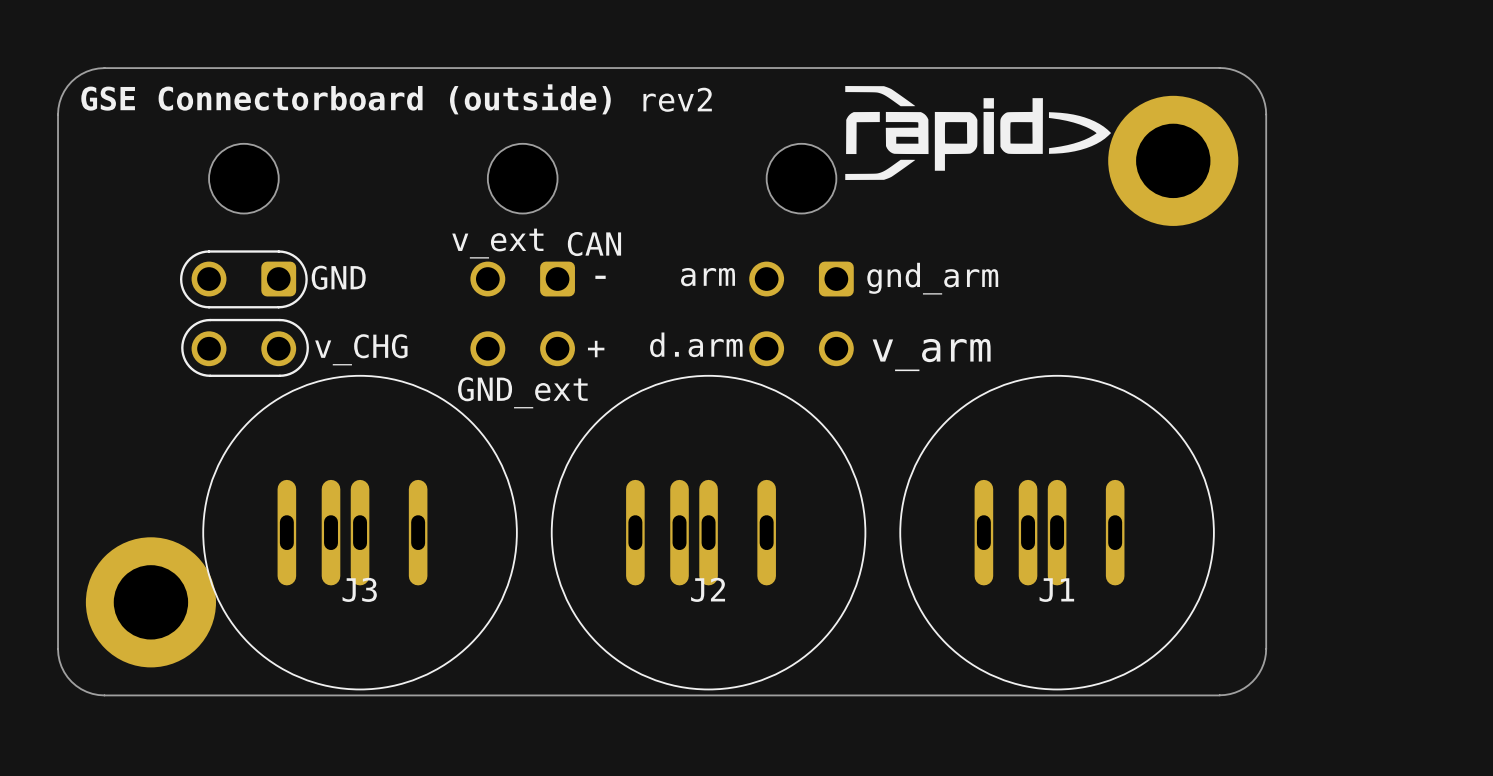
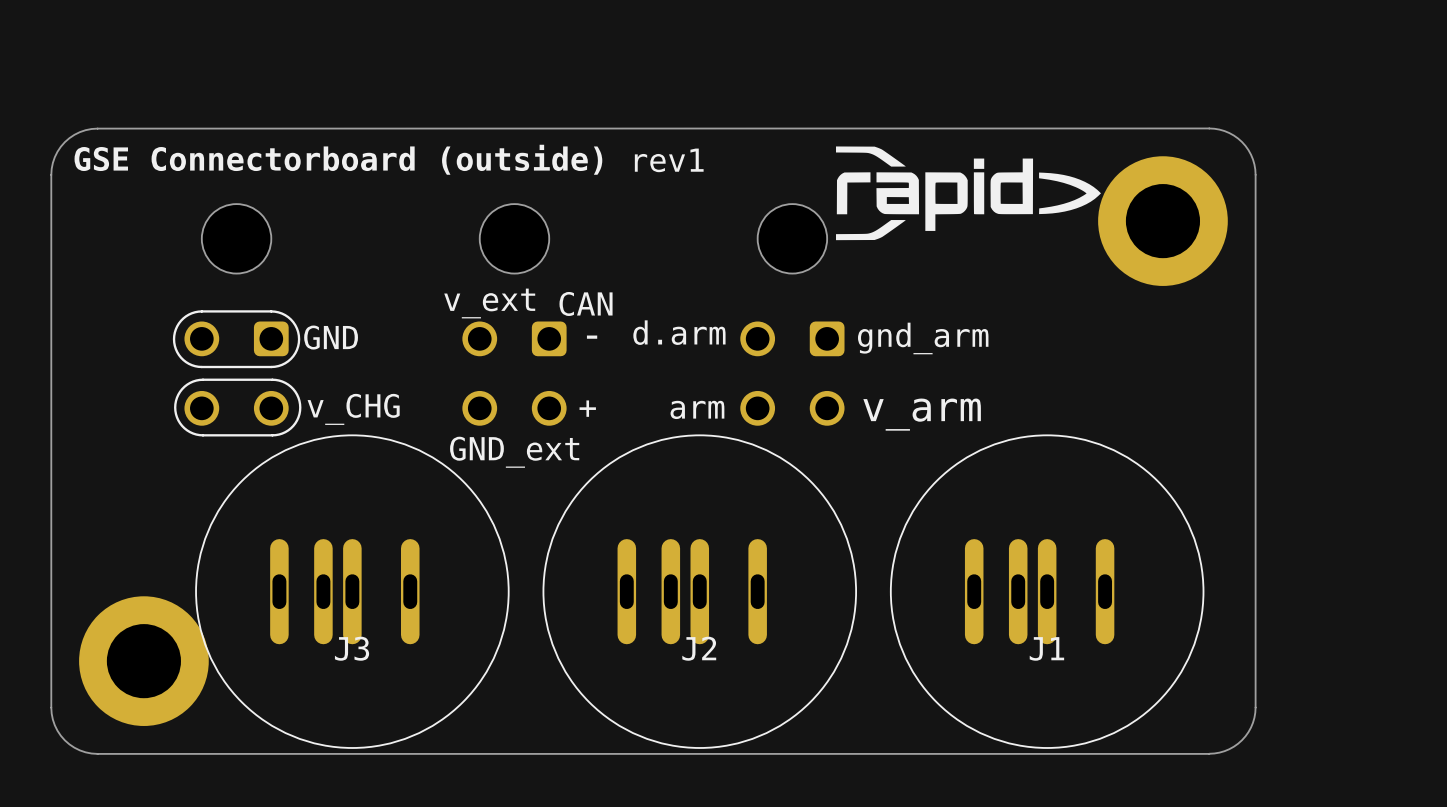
text: rev2 (677, 99) -> rev1 (669, 160)
text position: arm (707, 277) -> arm (697, 409)
text position: d.arm (696, 344) -> d.arm (679, 332)

